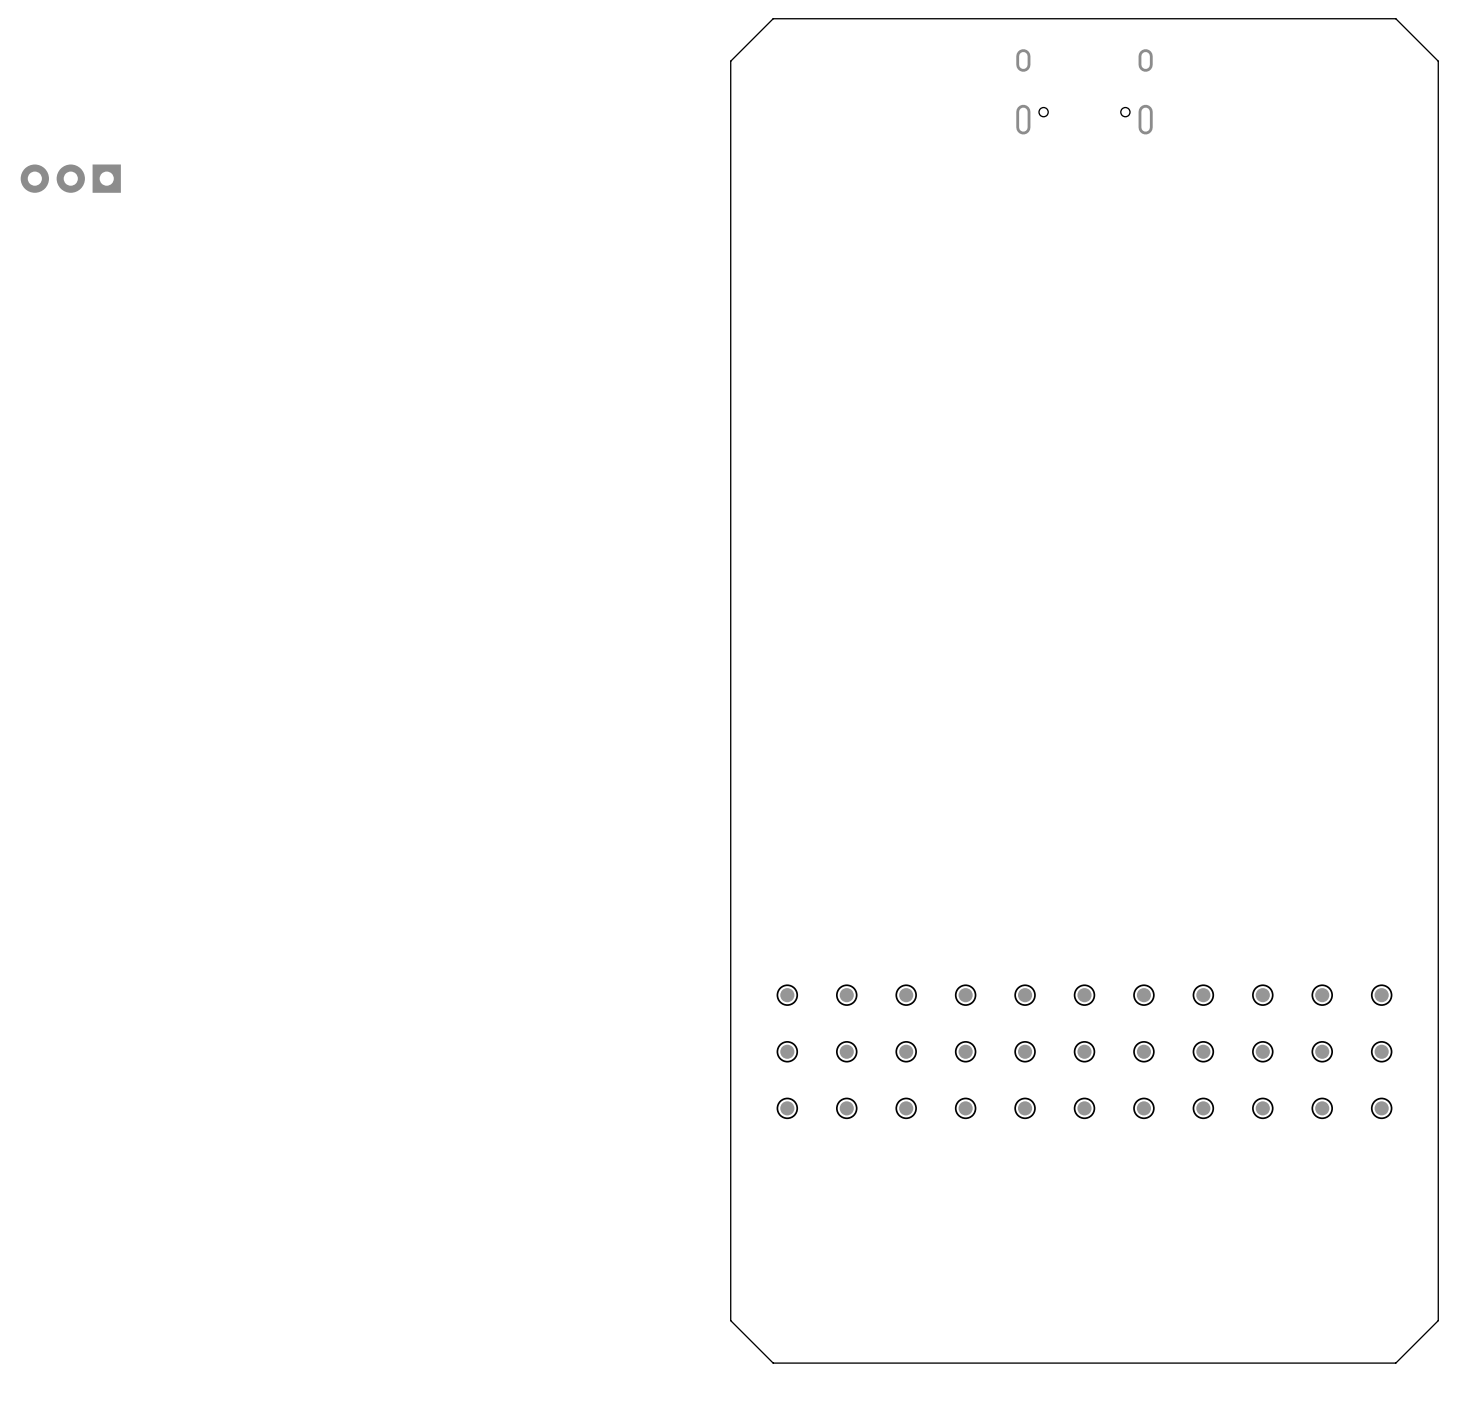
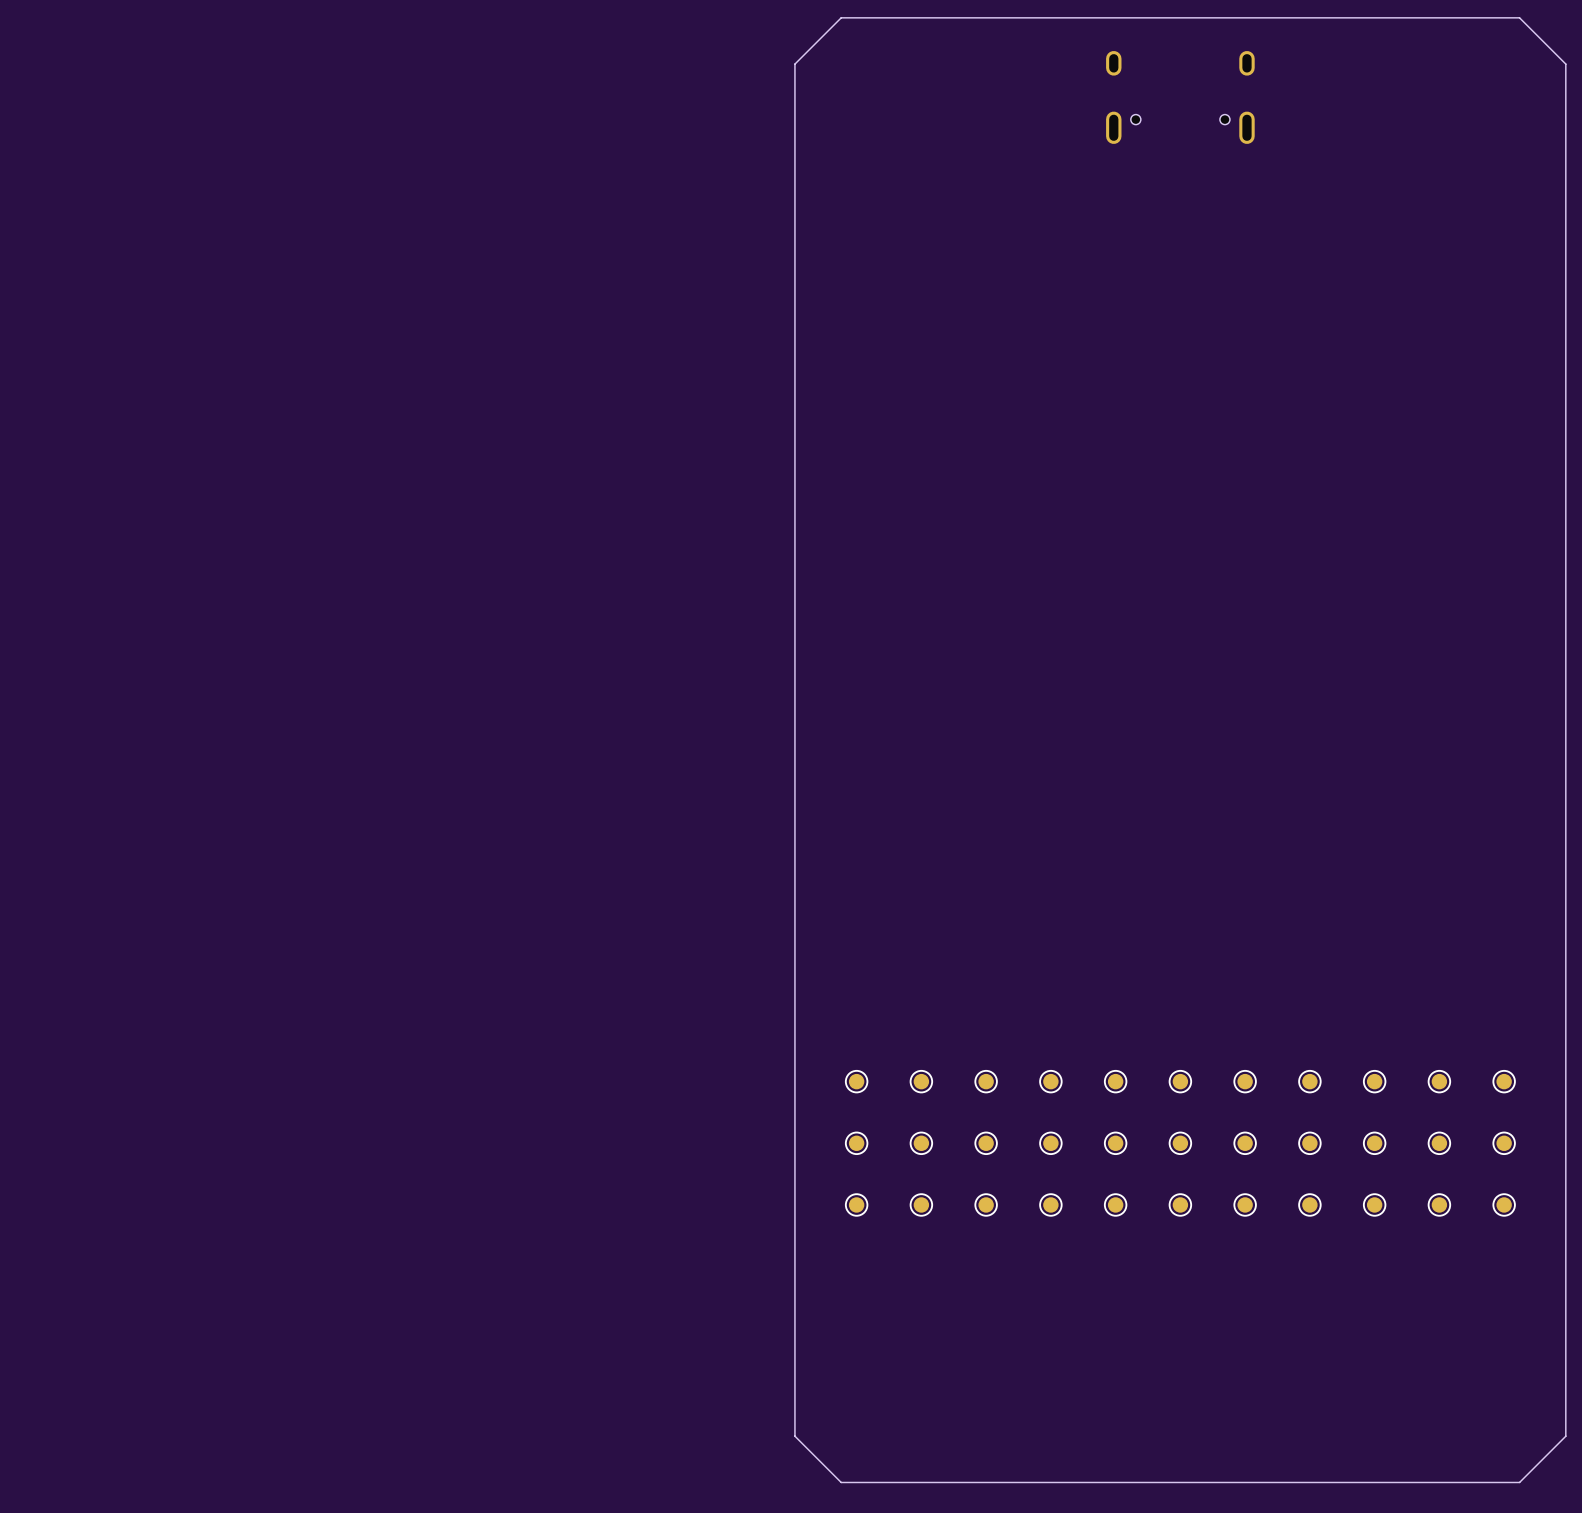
part: (70, 178) -> none

